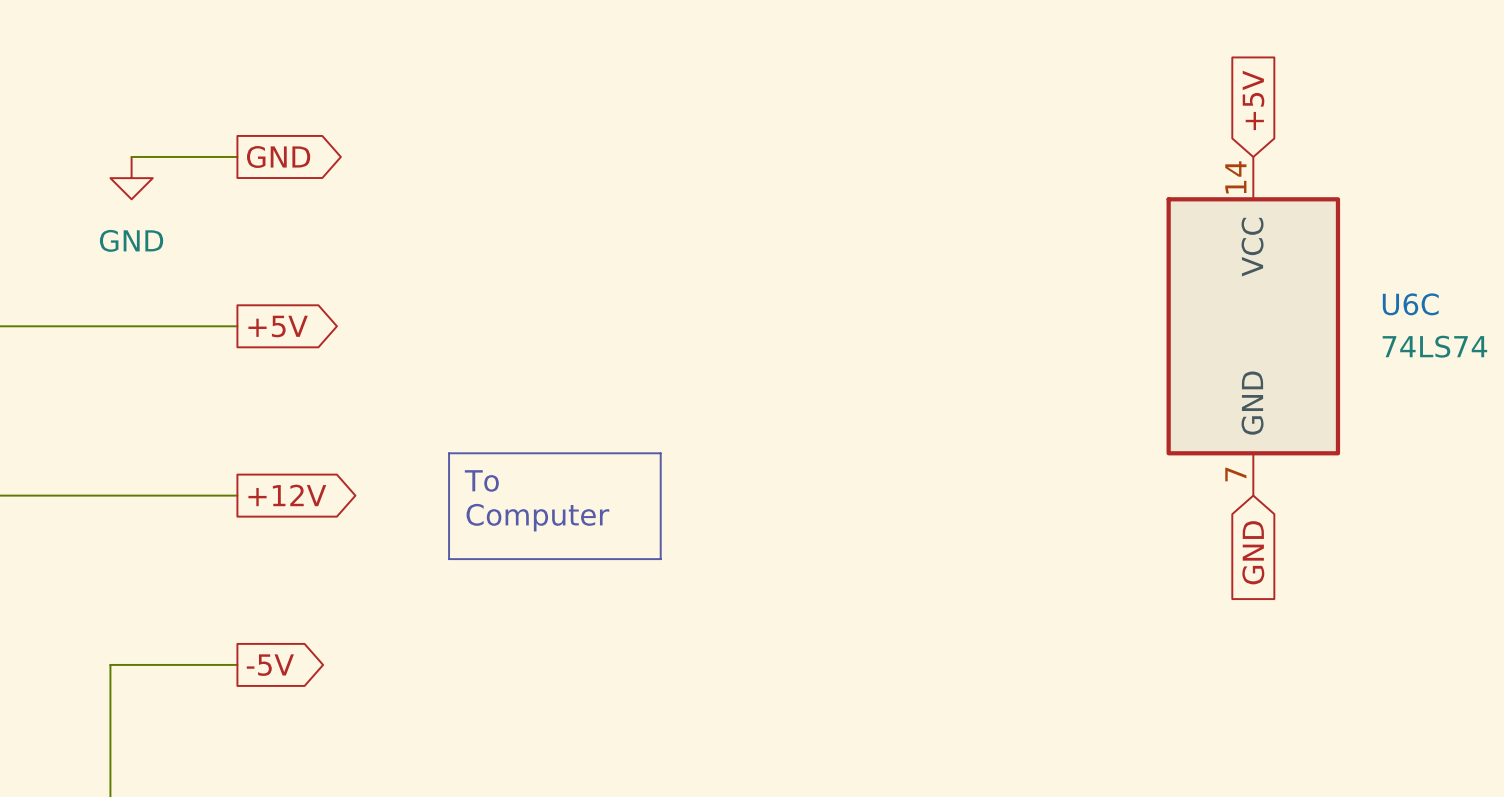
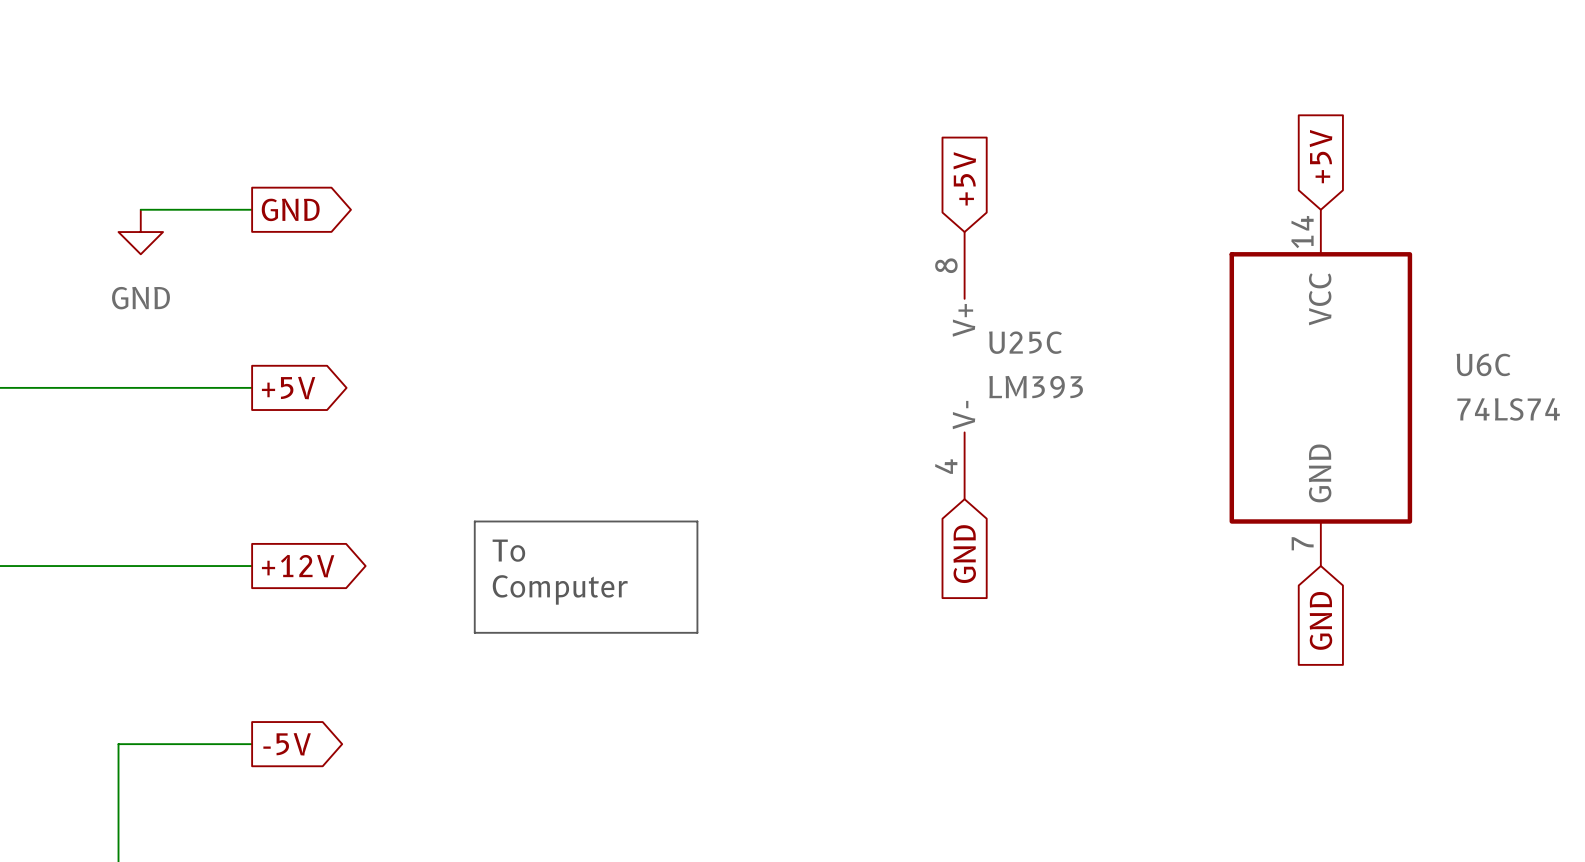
global label: none -> +5V (964, 178)
U25C: none -> LM393 (964, 365)
global label: none -> GND (964, 554)

